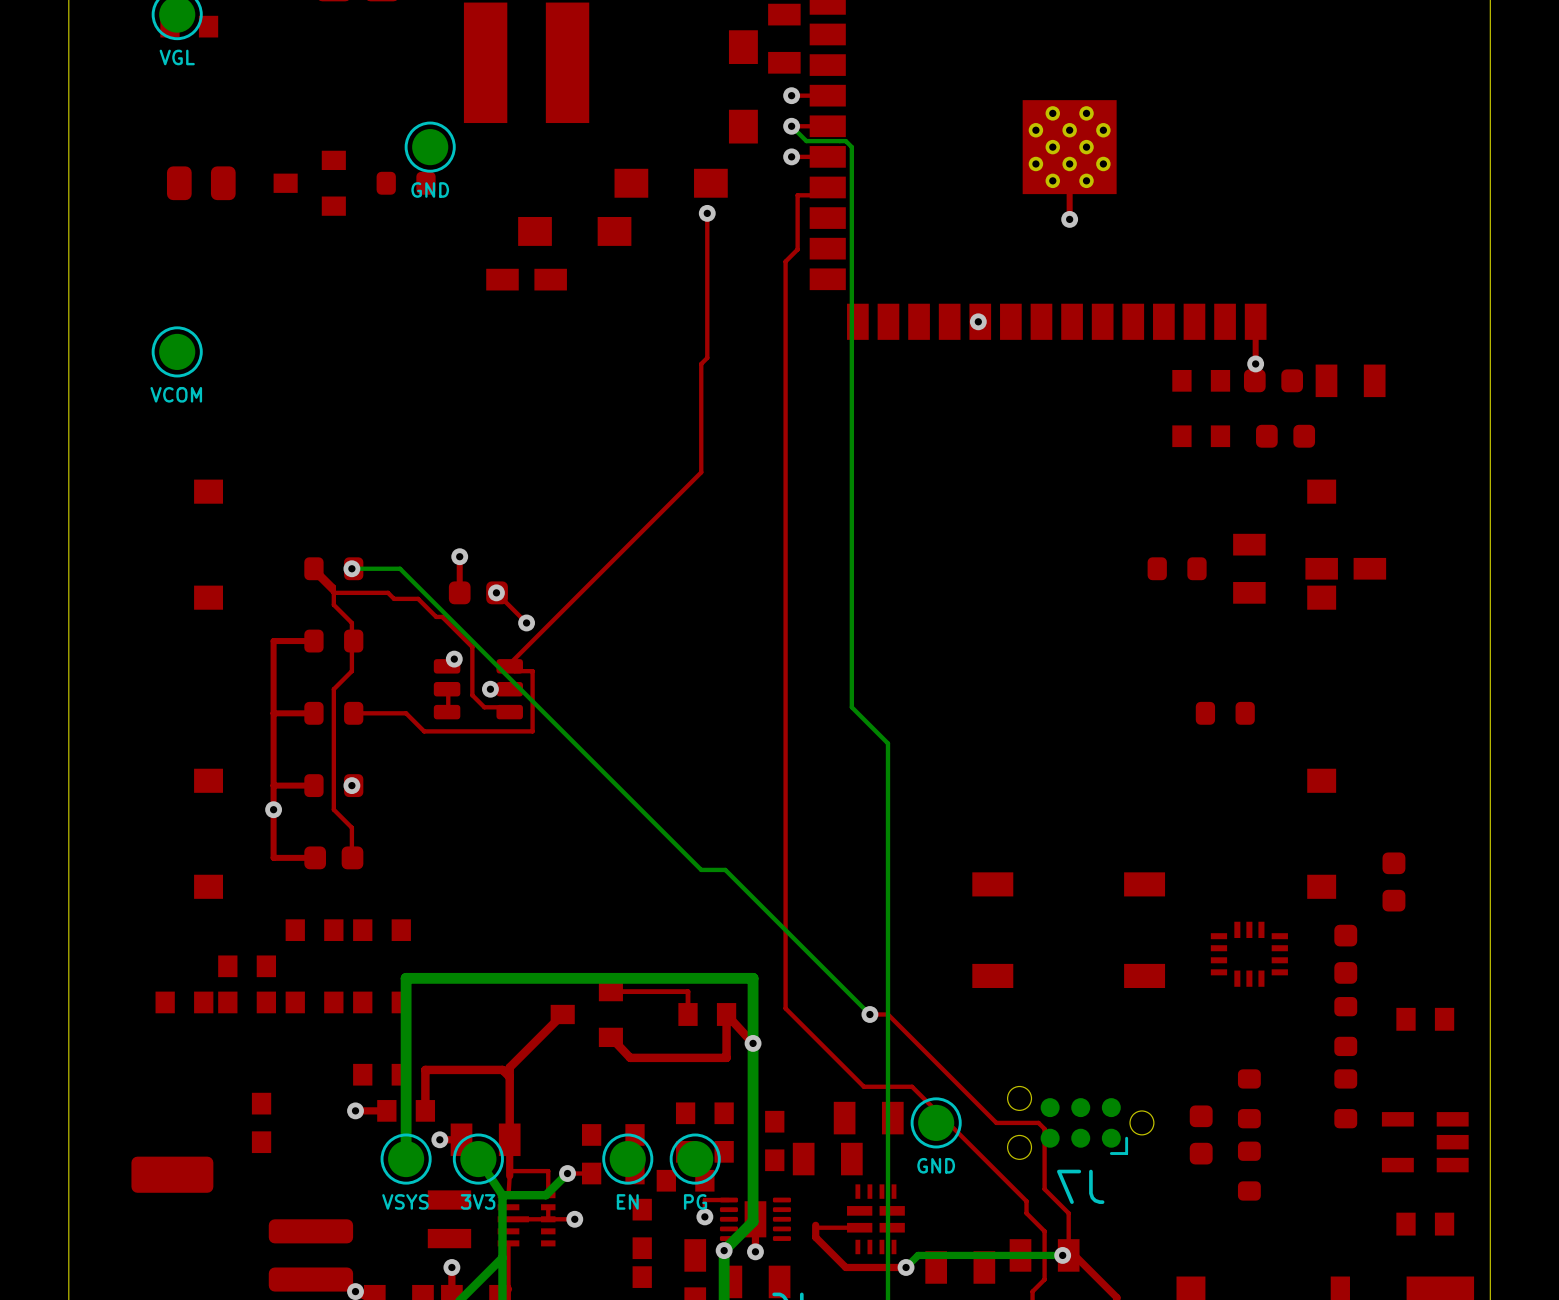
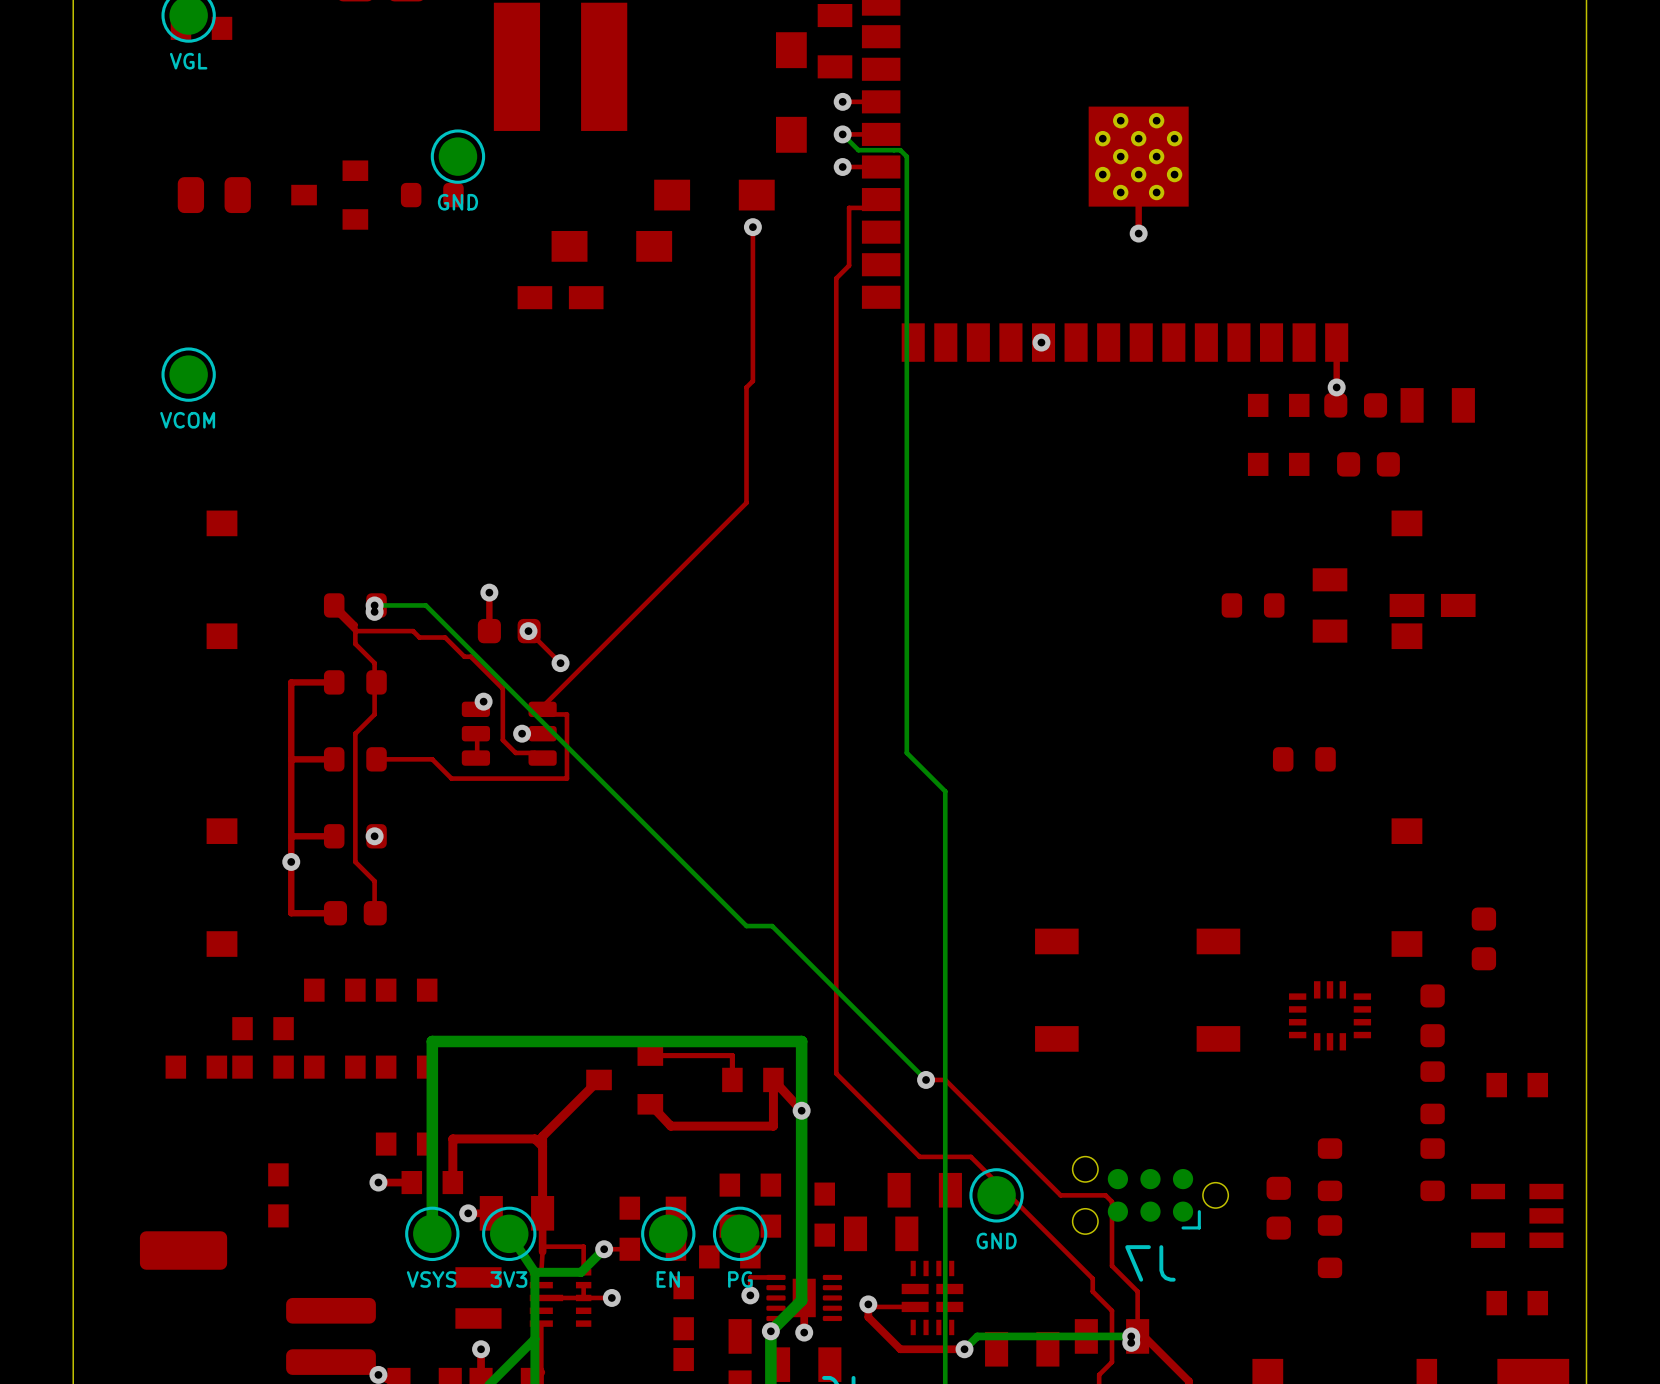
via: none -> (374, 611)
via: none -> (868, 1304)
via: none -> (1131, 1342)

